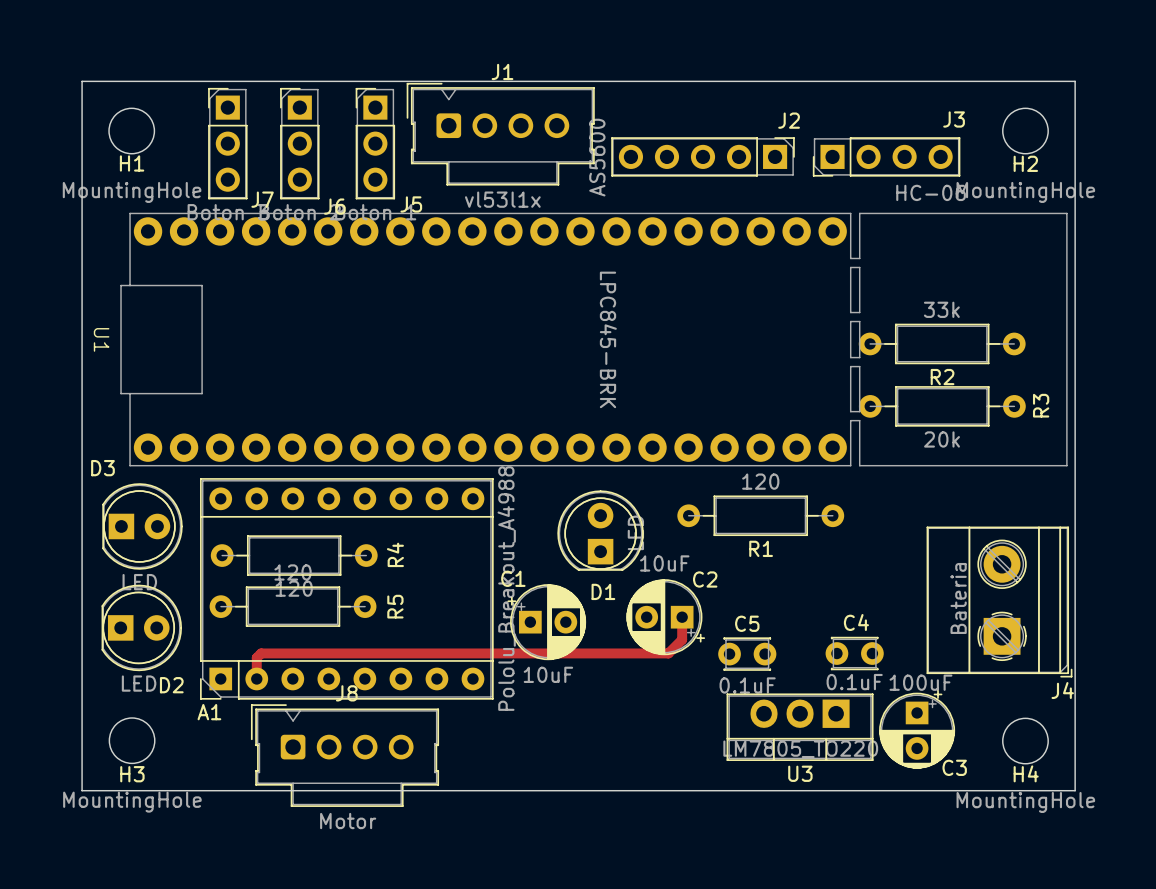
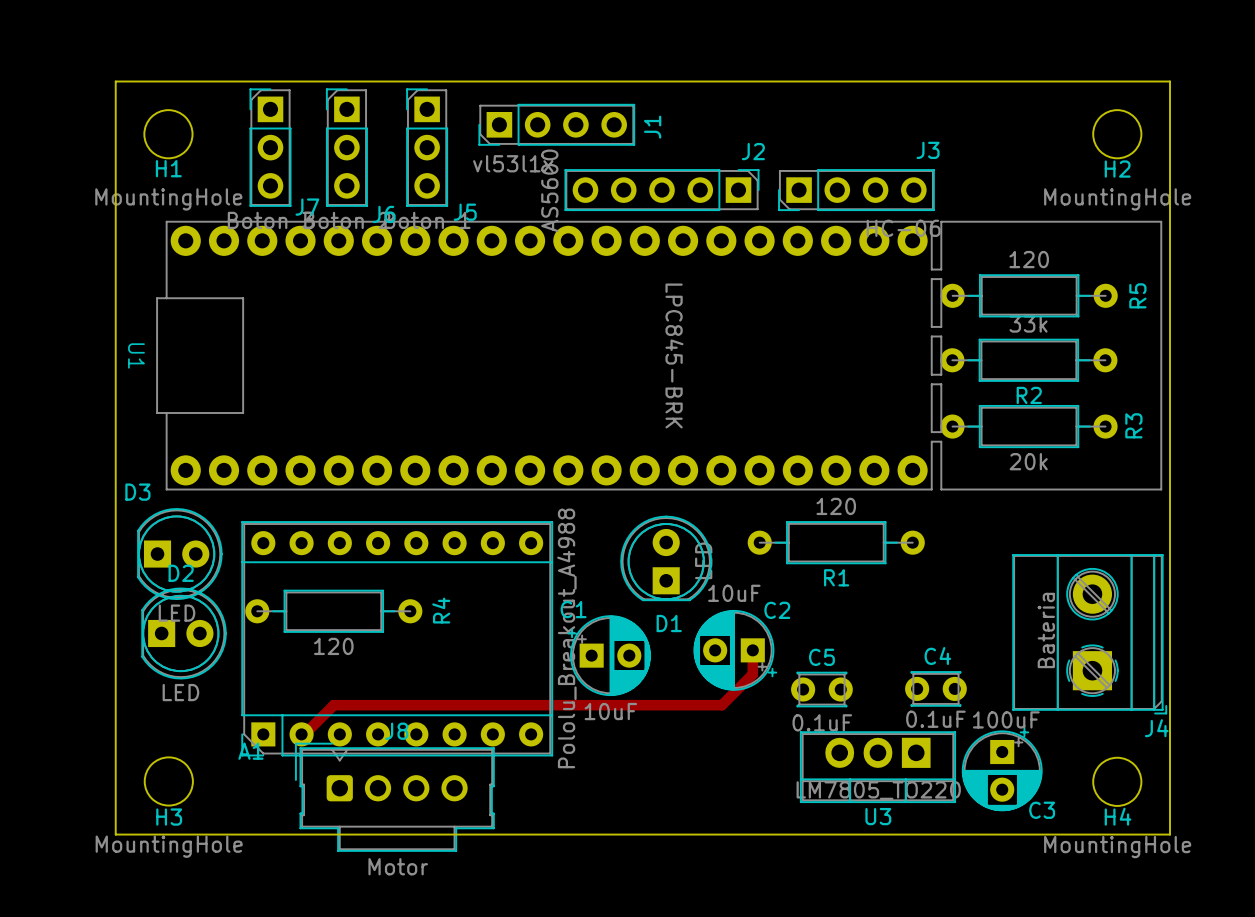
J1 name position: J1 (502, 71) -> J1 (652, 127)
J1 footprint: [406, 82, 595, 186] -> [478, 103, 636, 146]
J2 position: (703, 156) -> (661, 190)
J3 position: (886, 156) -> (856, 190)
J1 value position: vl53l1x (502, 199) -> vl53l1x (513, 163)
R4 position: (294, 555) -> (333, 611)
A1 position: (346, 588) -> (397, 638)
R5 position: (293, 606) -> (1029, 295)
D2 position: (141, 627) -> (184, 633)
track: (668, 653) (261, 653) (256, 657) (256, 678) -> (738, 688) (721, 705) (333, 705) (304, 734) (301, 734)
D2 name position: D2 (171, 685) -> D2 (181, 573)

